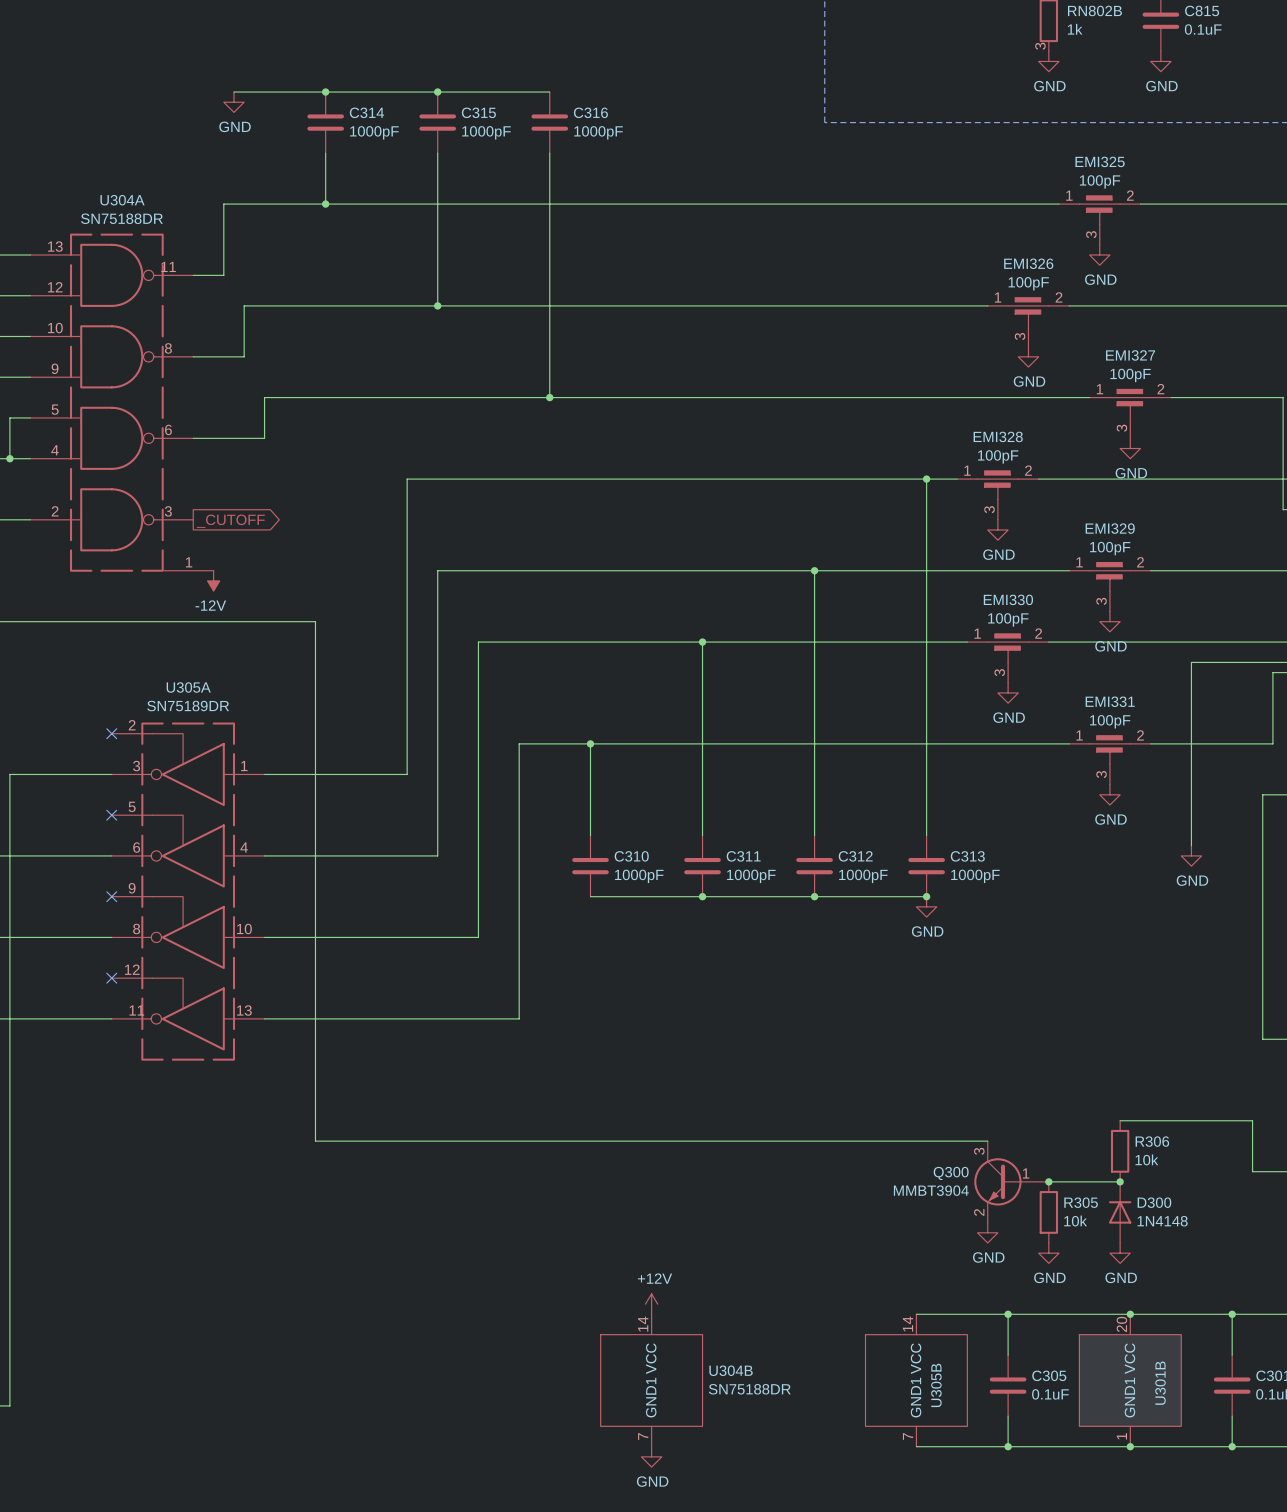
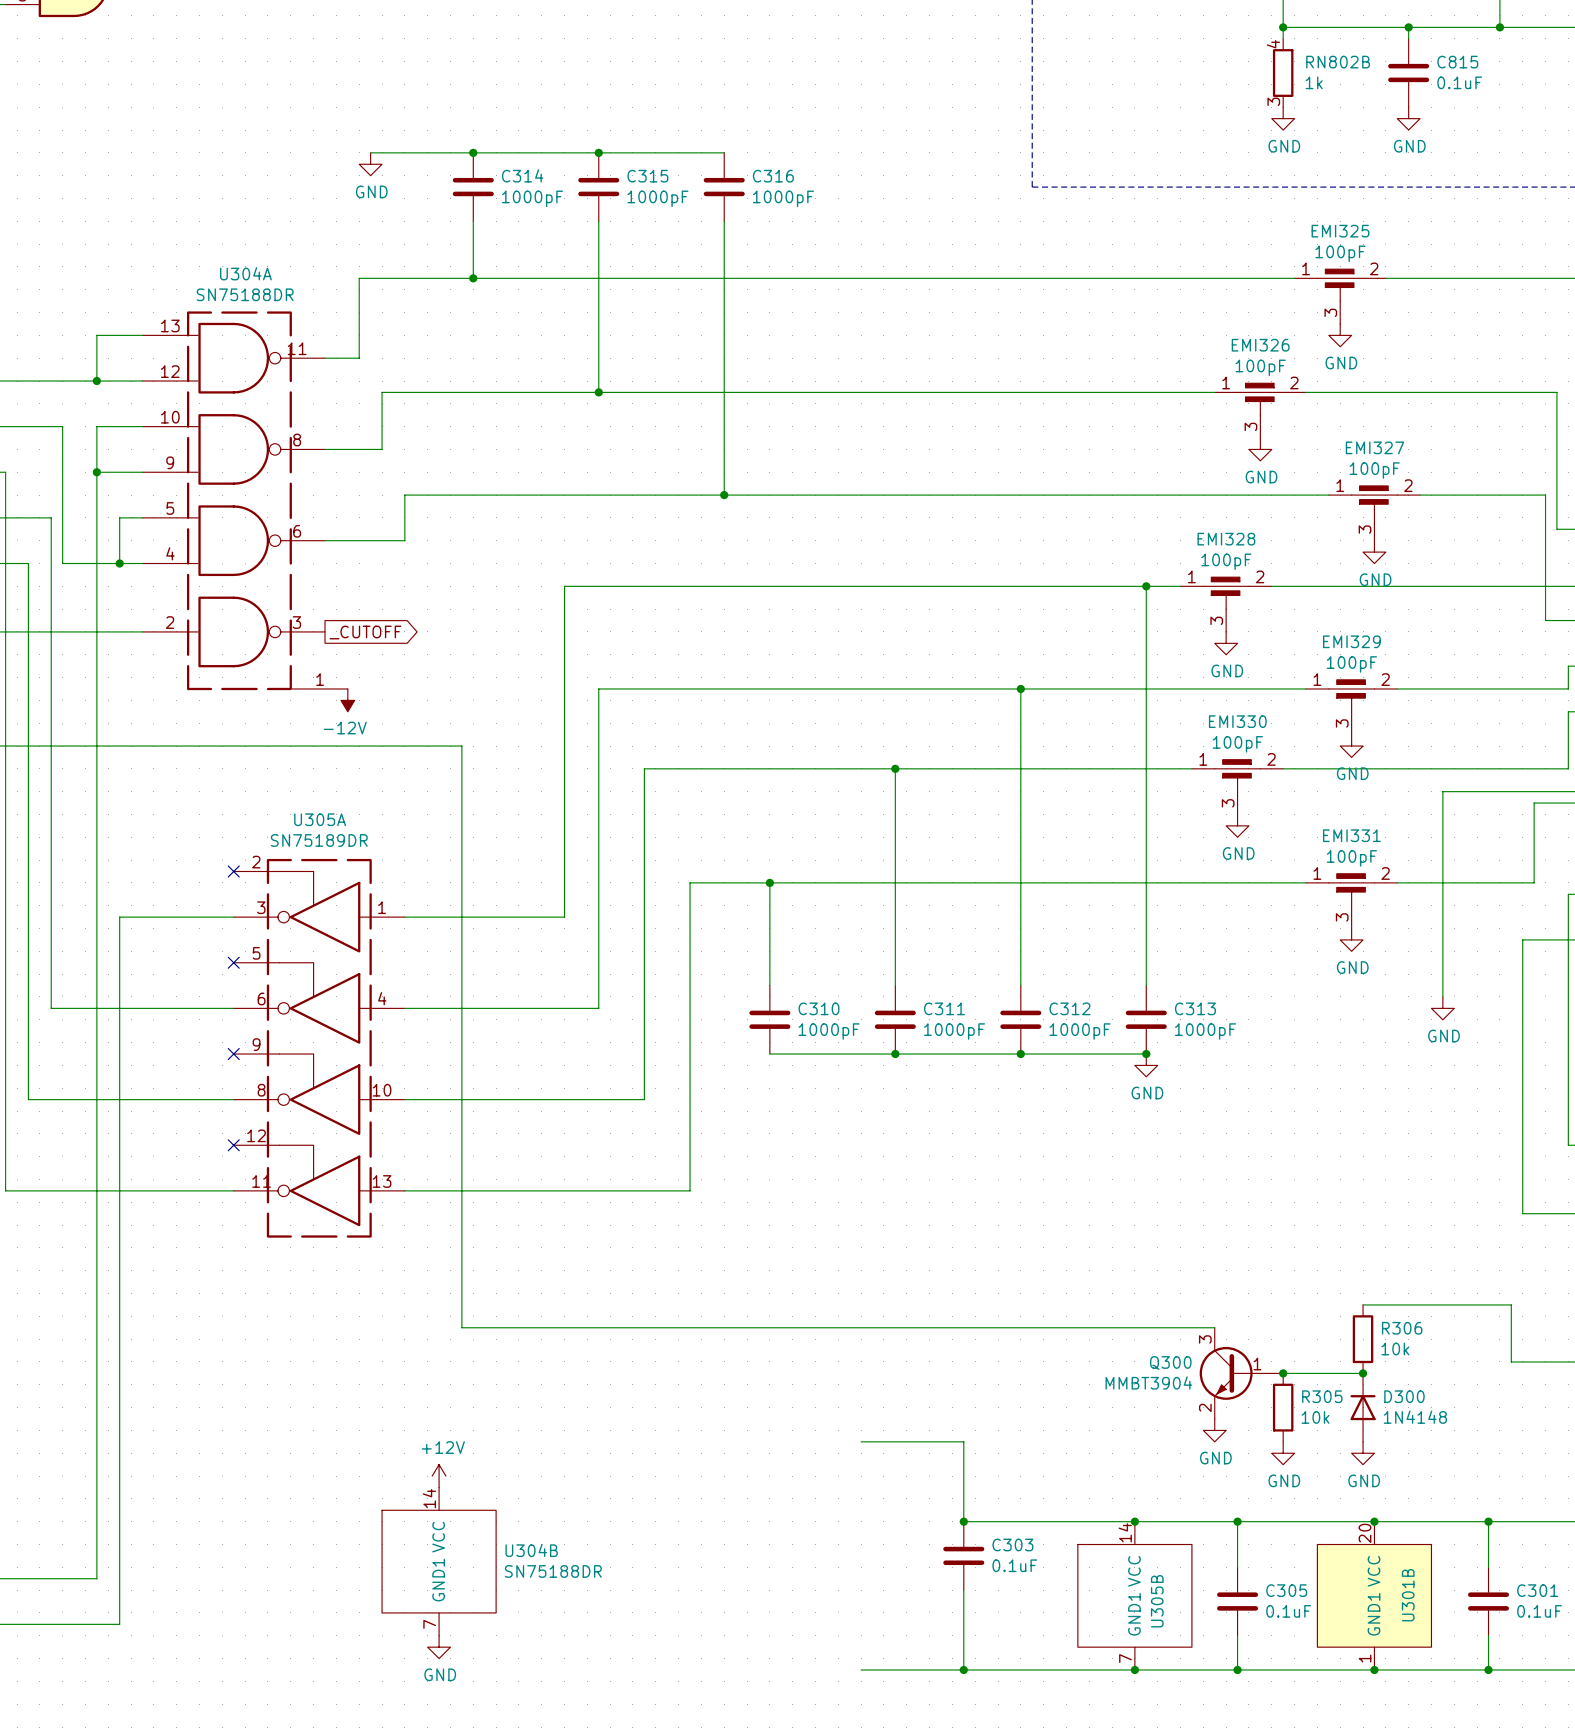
wire: none -> (861, 1441) (963, 1441) (963, 1521) (1134, 1521)
power symbol: none -> +12V (439, 1476)
power symbol: +12V (651, 1304) -> none
junction: none -> (963, 1521)
junction: none -> (1134, 1521)
C303: none -> 0.1uF (963, 1555)
wire: none -> (963, 1590) (963, 1669)
U304B position: (651, 1380) -> (439, 1561)
power symbol: none -> GND (439, 1647)
wire: none -> (861, 1669) (1134, 1669)
junction: none -> (963, 1669)
junction: none -> (1134, 1669)
power symbol: GND (651, 1456) -> none

